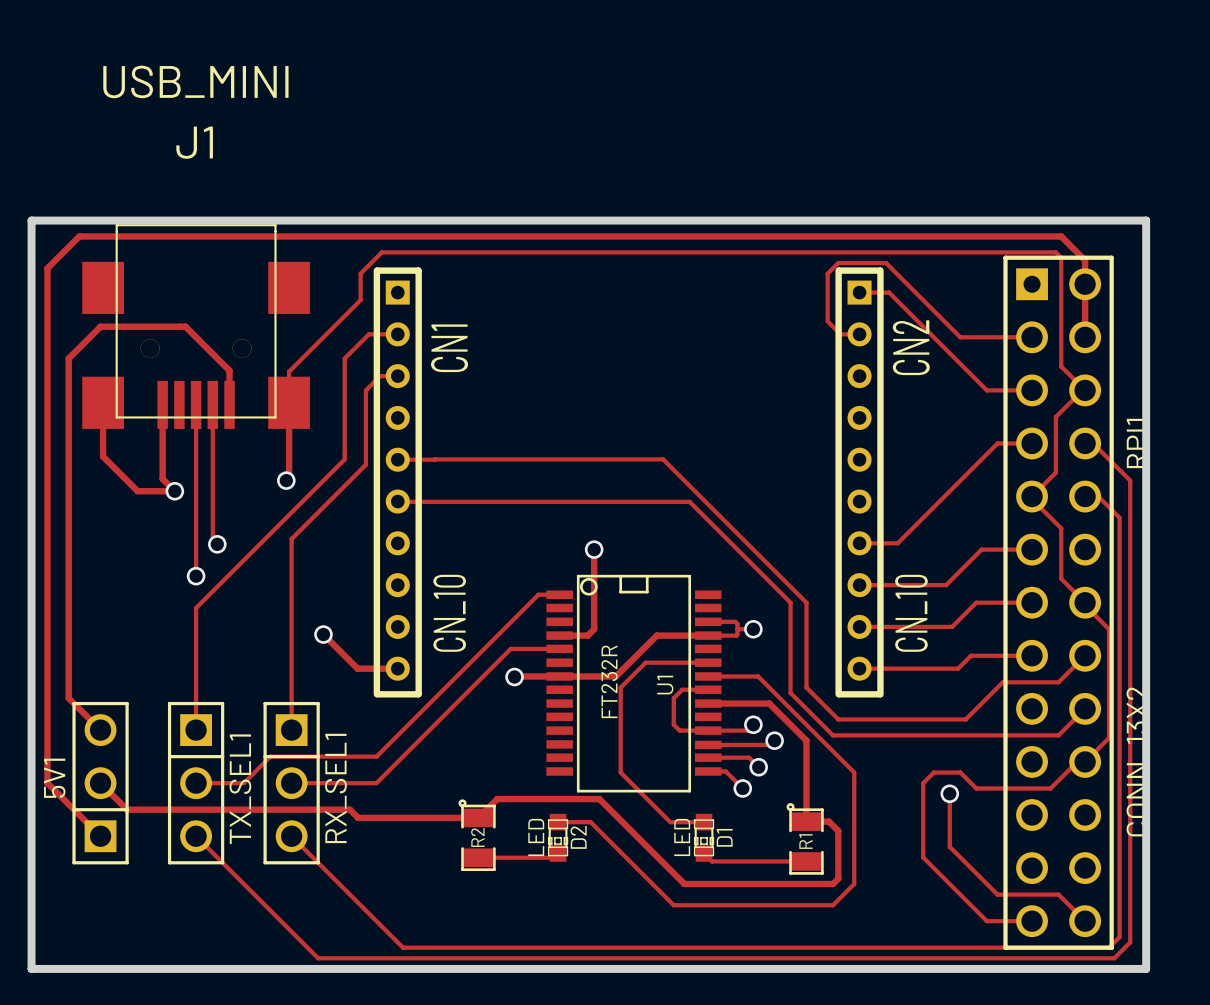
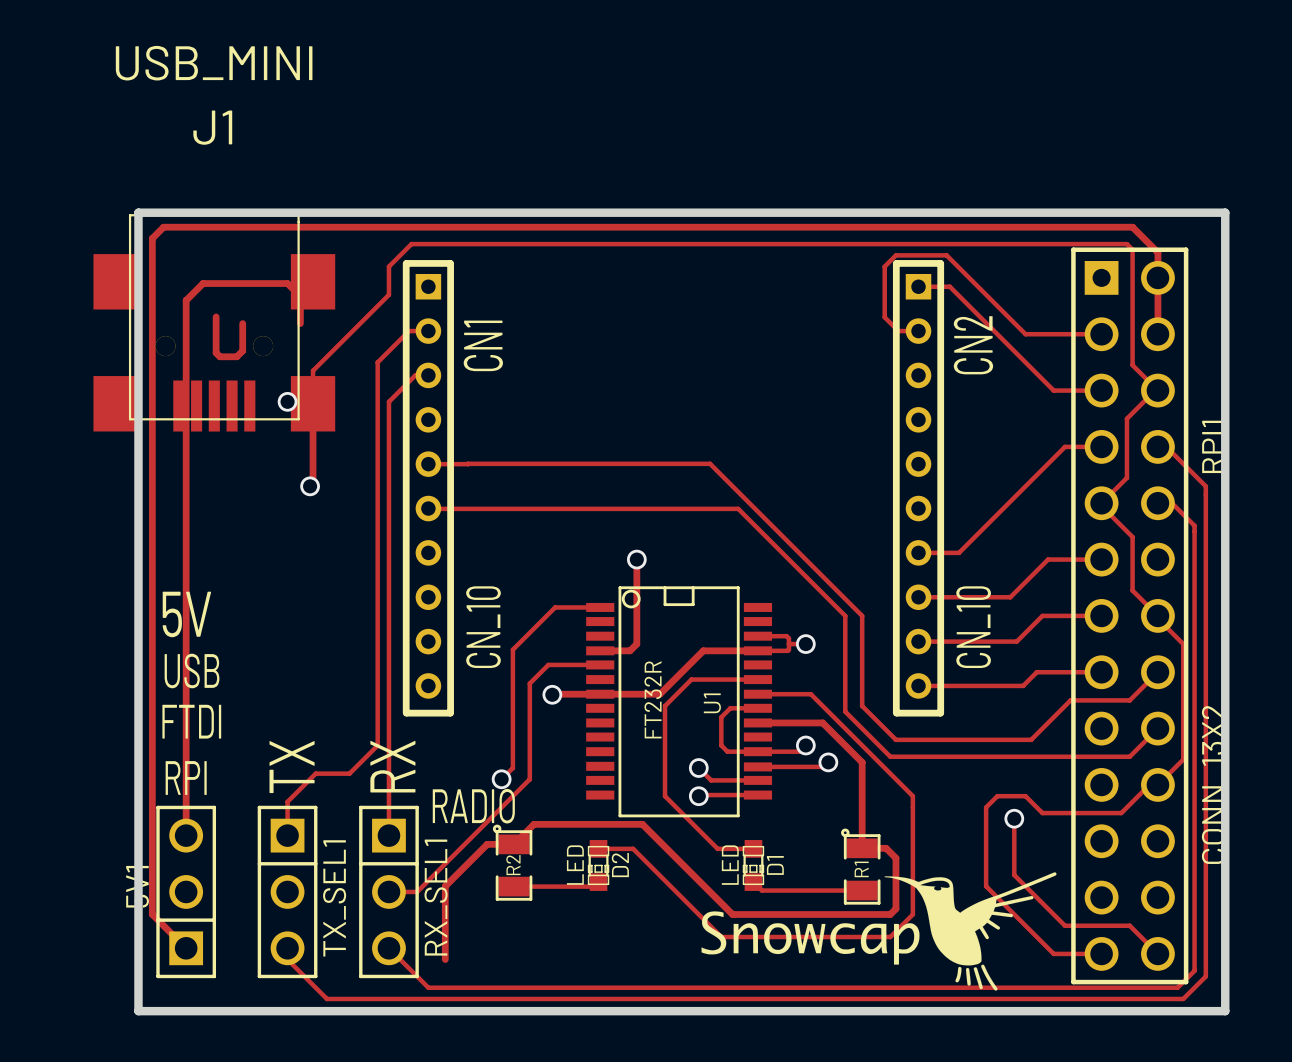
board edge: (31, 220) (31, 968) (1146, 968) (1146, 220) (31, 220) -> (138, 212) (138, 1011) (1225, 1011) (1225, 212) (138, 212)
track: (148, 236) (79, 236) (47, 268) (47, 783) (100, 836) -> (163, 227) (152, 238) (152, 914) (186, 948)
track: none -> (216, 316) (216, 352) (219, 356) (236, 356) (242, 350) (242, 323)
track: none -> (300, 323) (300, 296) (287, 283) (203, 283) (186, 300) (186, 835)
track: (379, 334) (368, 334) (344, 358) (344, 459) (196, 608) (196, 730) -> (409, 331) (377, 362) (377, 745) (349, 773) (315, 773) (287, 801) (287, 835)
track: (385, 376) (380, 376) (365, 390) (365, 464) (291, 539) (291, 730) -> (415, 375) (388, 401) (388, 835)
via: none -> (287, 401)
track: (103, 402) (103, 456) (137, 491) (174, 491) (162, 479) (162, 404) -> none
track: (196, 404) (196, 576) -> none
track: (212, 404) (212, 539) (217, 544) -> none
track: (229, 404) (229, 370) (185, 326) (100, 326) (68, 358) (68, 698) (100, 730) -> none
via: (174, 491) -> none
via: (217, 544) -> none
via: (196, 576) -> none
track: (538, 594) (376, 756) (270, 756) (243, 783) (196, 783) -> (577, 607) (555, 607) (512, 649) (512, 768) (501, 779)
text: none -> 5V (186, 614)
track: (323, 634) (357, 668) (397, 668) -> none
via: (323, 634) -> none
text: none -> USB (192, 670)
track: (493, 666) (376, 783) (291, 783) -> (529, 683) (529, 779) (417, 891) (388, 891)
text: none -> FTDI (191, 721)
text: none -> RX (392, 766)
text: none -> TX (292, 767)
via: none -> (698, 768)
text: none -> RPI (186, 778)
via: none -> (501, 779)
track: (708, 757) (749, 757) (758, 767) -> (757, 780) (711, 780) (698, 768)
via: (758, 767) -> none
track: (708, 771) (725, 771) (742, 788) -> (757, 795) (698, 796)
via: none -> (698, 796)
text: none -> RADIO (473, 806)
track: (100, 783) (127, 809) (350, 809) (358, 817) (453, 817) -> (445, 959) (445, 886) (487, 844)
5V1 position: (100, 783) -> (186, 891)
TX_SEL1 position: (196, 783) -> (287, 891)
RX_SEL1 position: (291, 783) -> (388, 891)
via: (742, 788) -> none
track: (196, 836) (318, 958) (1114, 958) -> (287, 948) (287, 959) (327, 998) (1183, 998) (1188, 993)
track: (291, 836) (403, 947) (1109, 947) -> (388, 948) (428, 987) (1177, 987) (1183, 982)
drawing: none -> [701, 872, 1057, 991]

